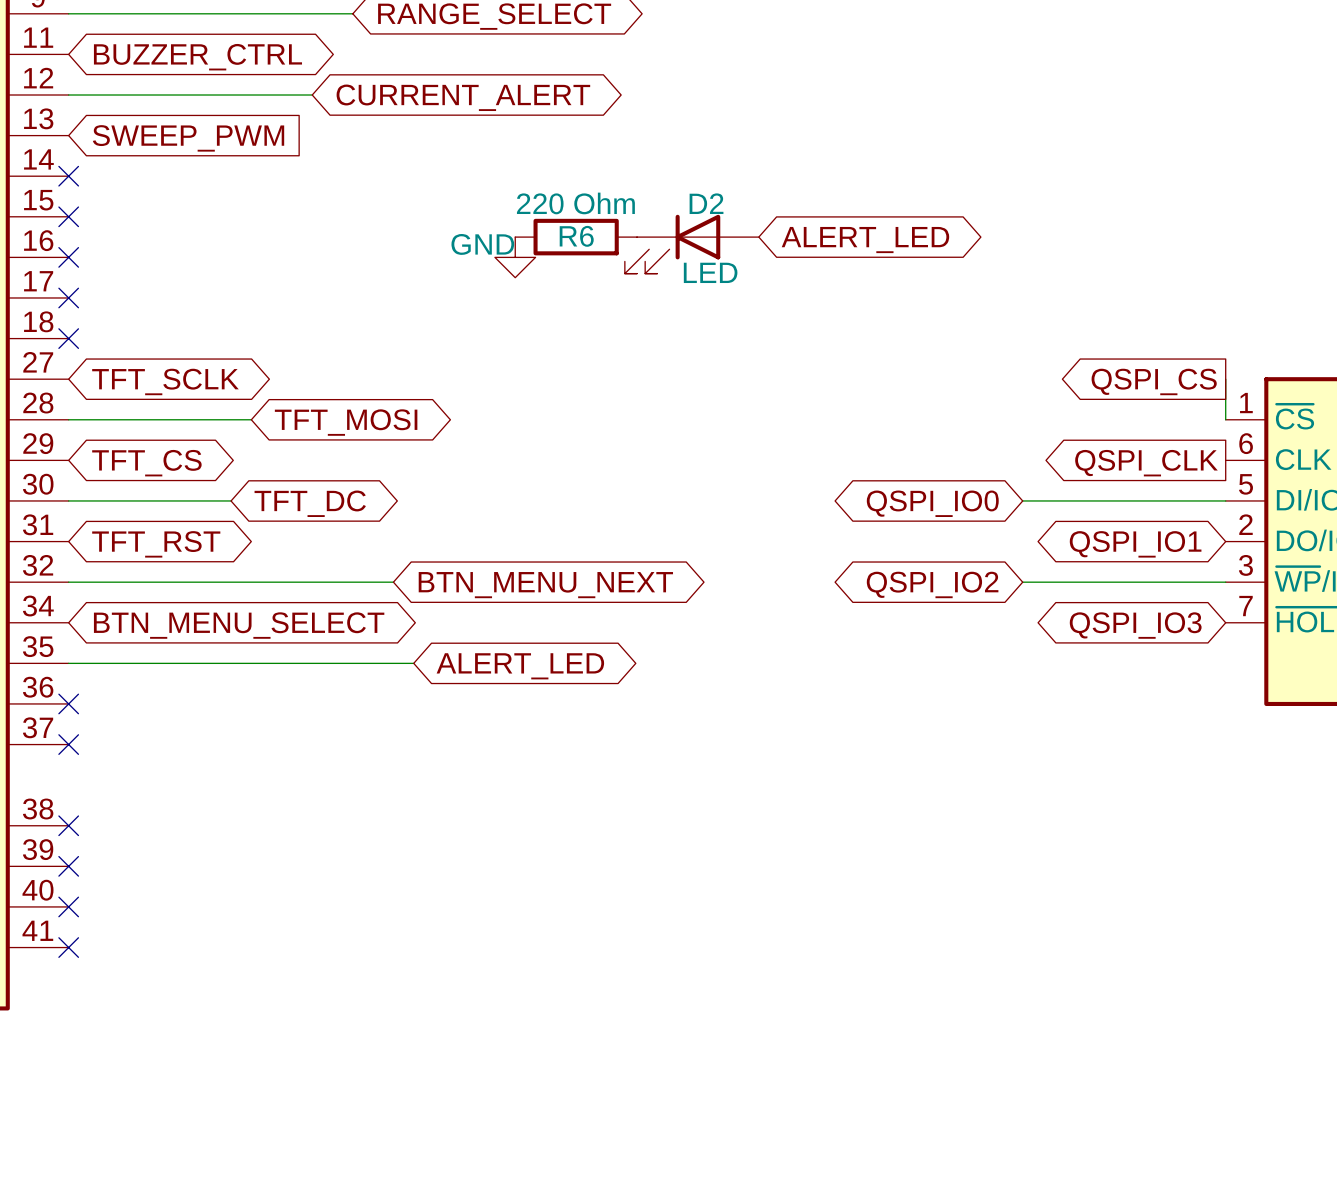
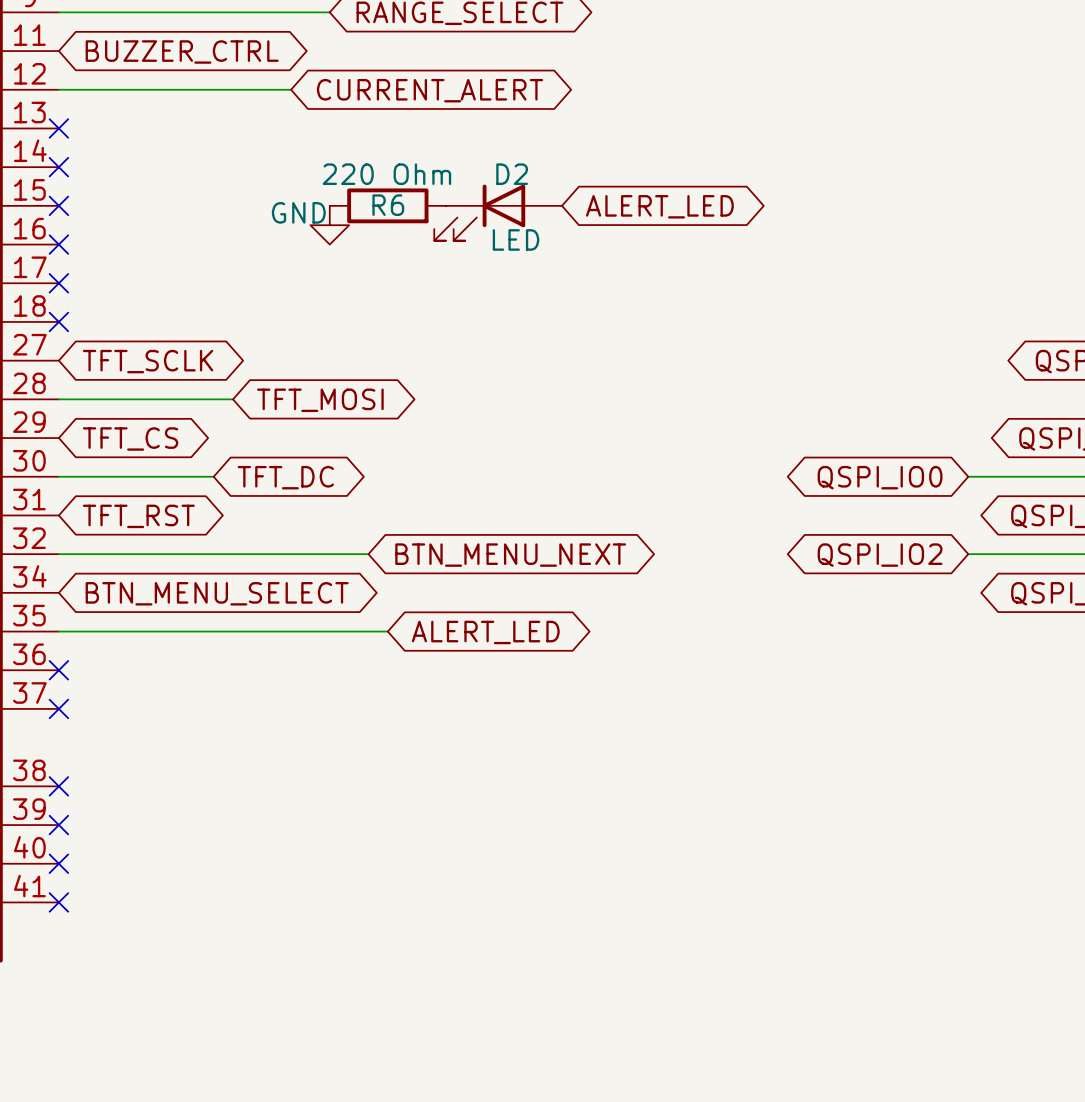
no-connect mark: none -> (58, 128)
global label: SWEEP_PWM (188, 138) -> none
R6 position: (576, 237) -> (387, 205)
global label position: ALERT_LED (865, 240) -> ALERT_LED (659, 206)
D2 position: (691, 244) -> (498, 212)
power symbol position: GND (515, 257) -> GND (329, 225)

